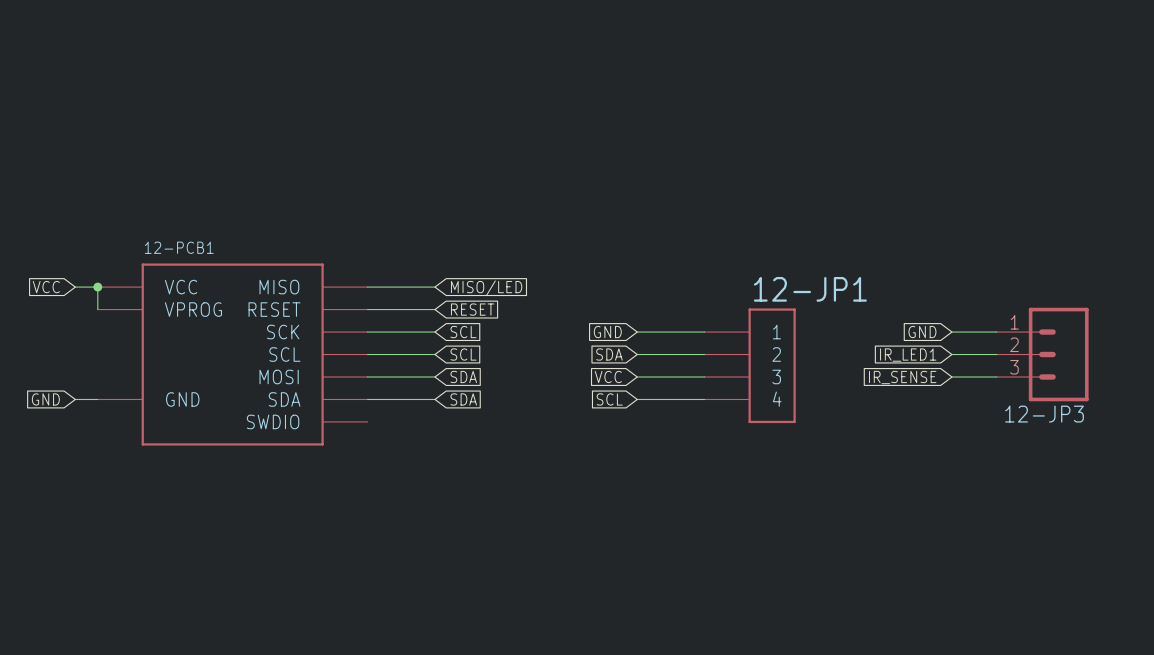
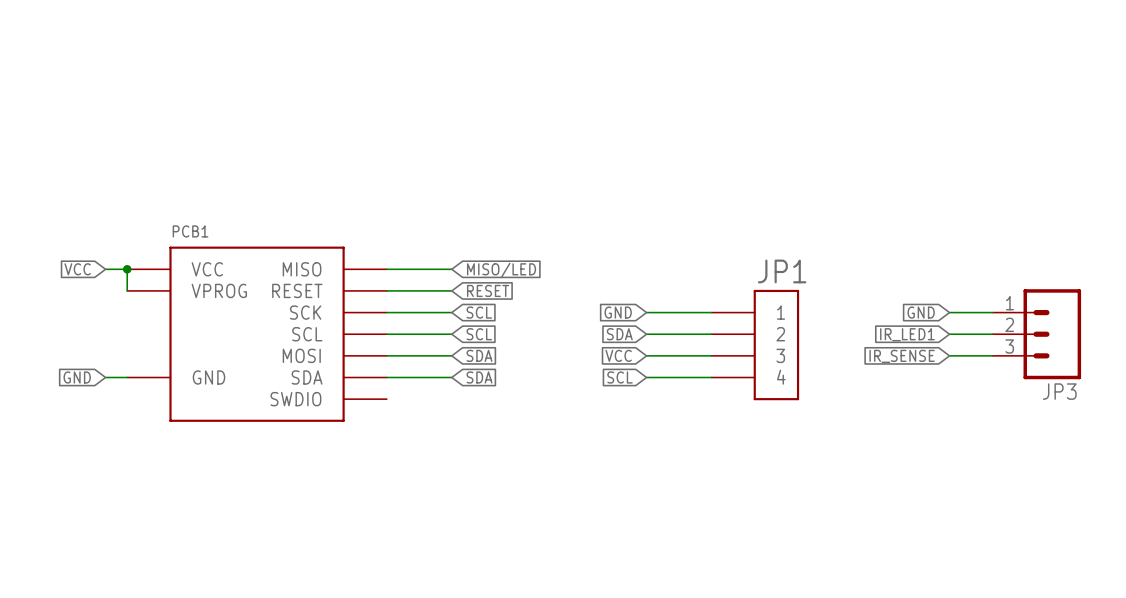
12-PCB1 name: 12-PCB1 (179, 247) -> PCB1 (190, 231)
12-JP1 name: 12-JP1 (810, 289) -> JP1 (782, 271)
12-JP3 name: 12-JP3 (1044, 414) -> JP3 (1059, 391)

